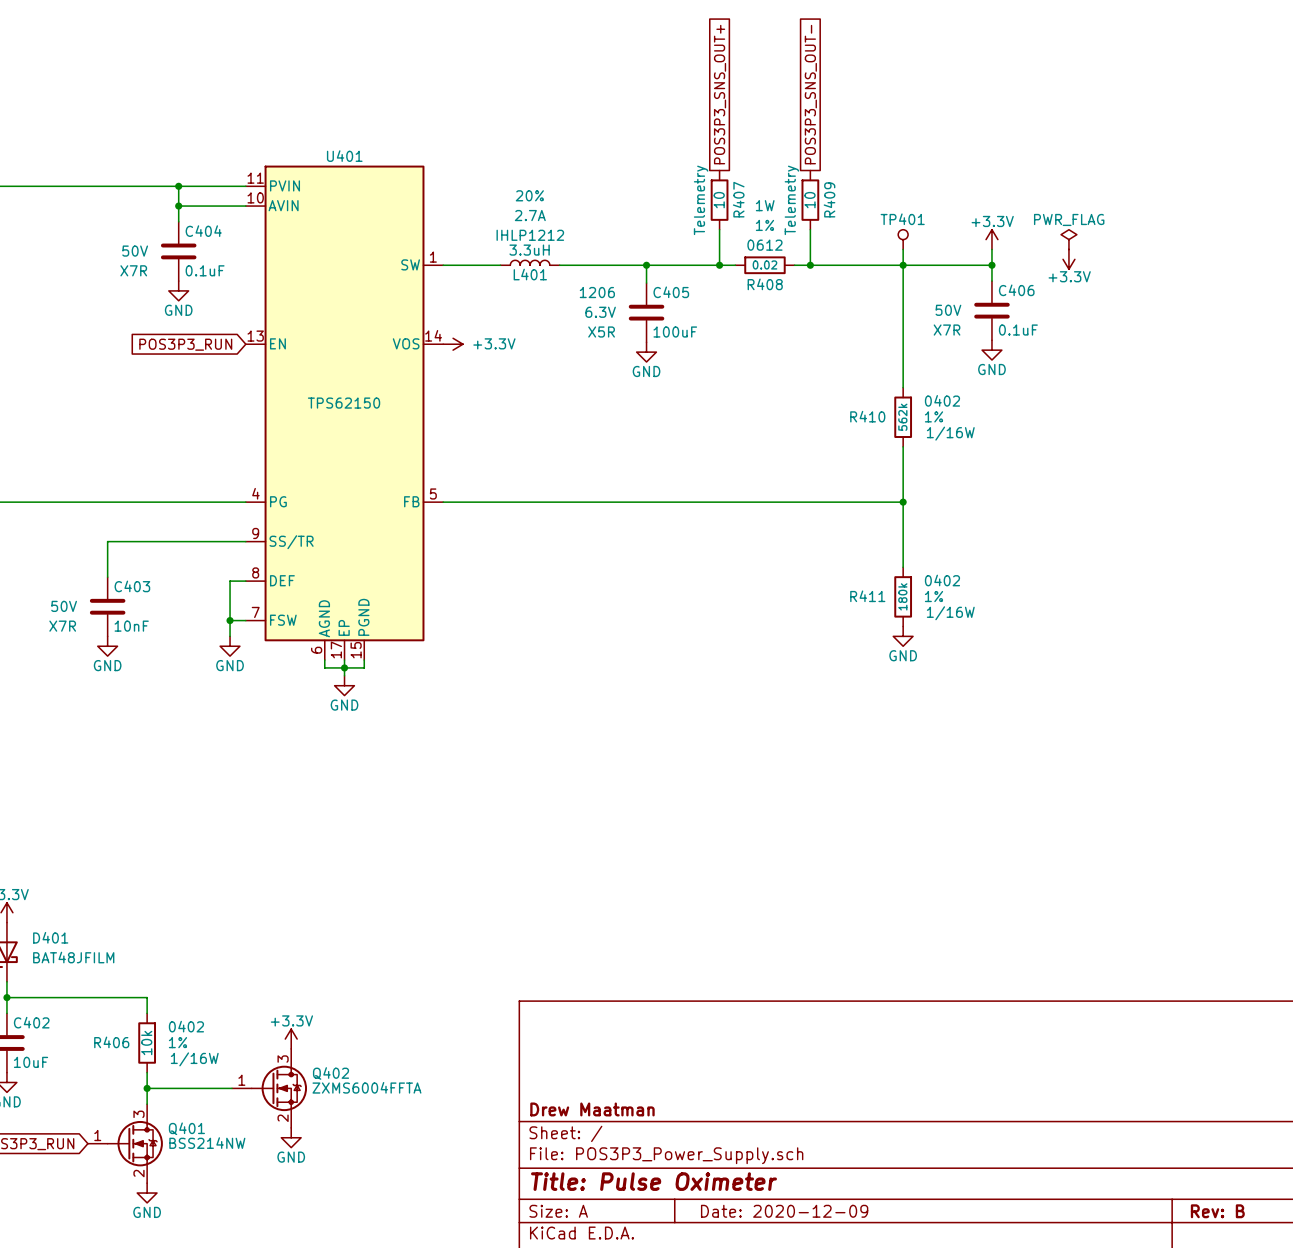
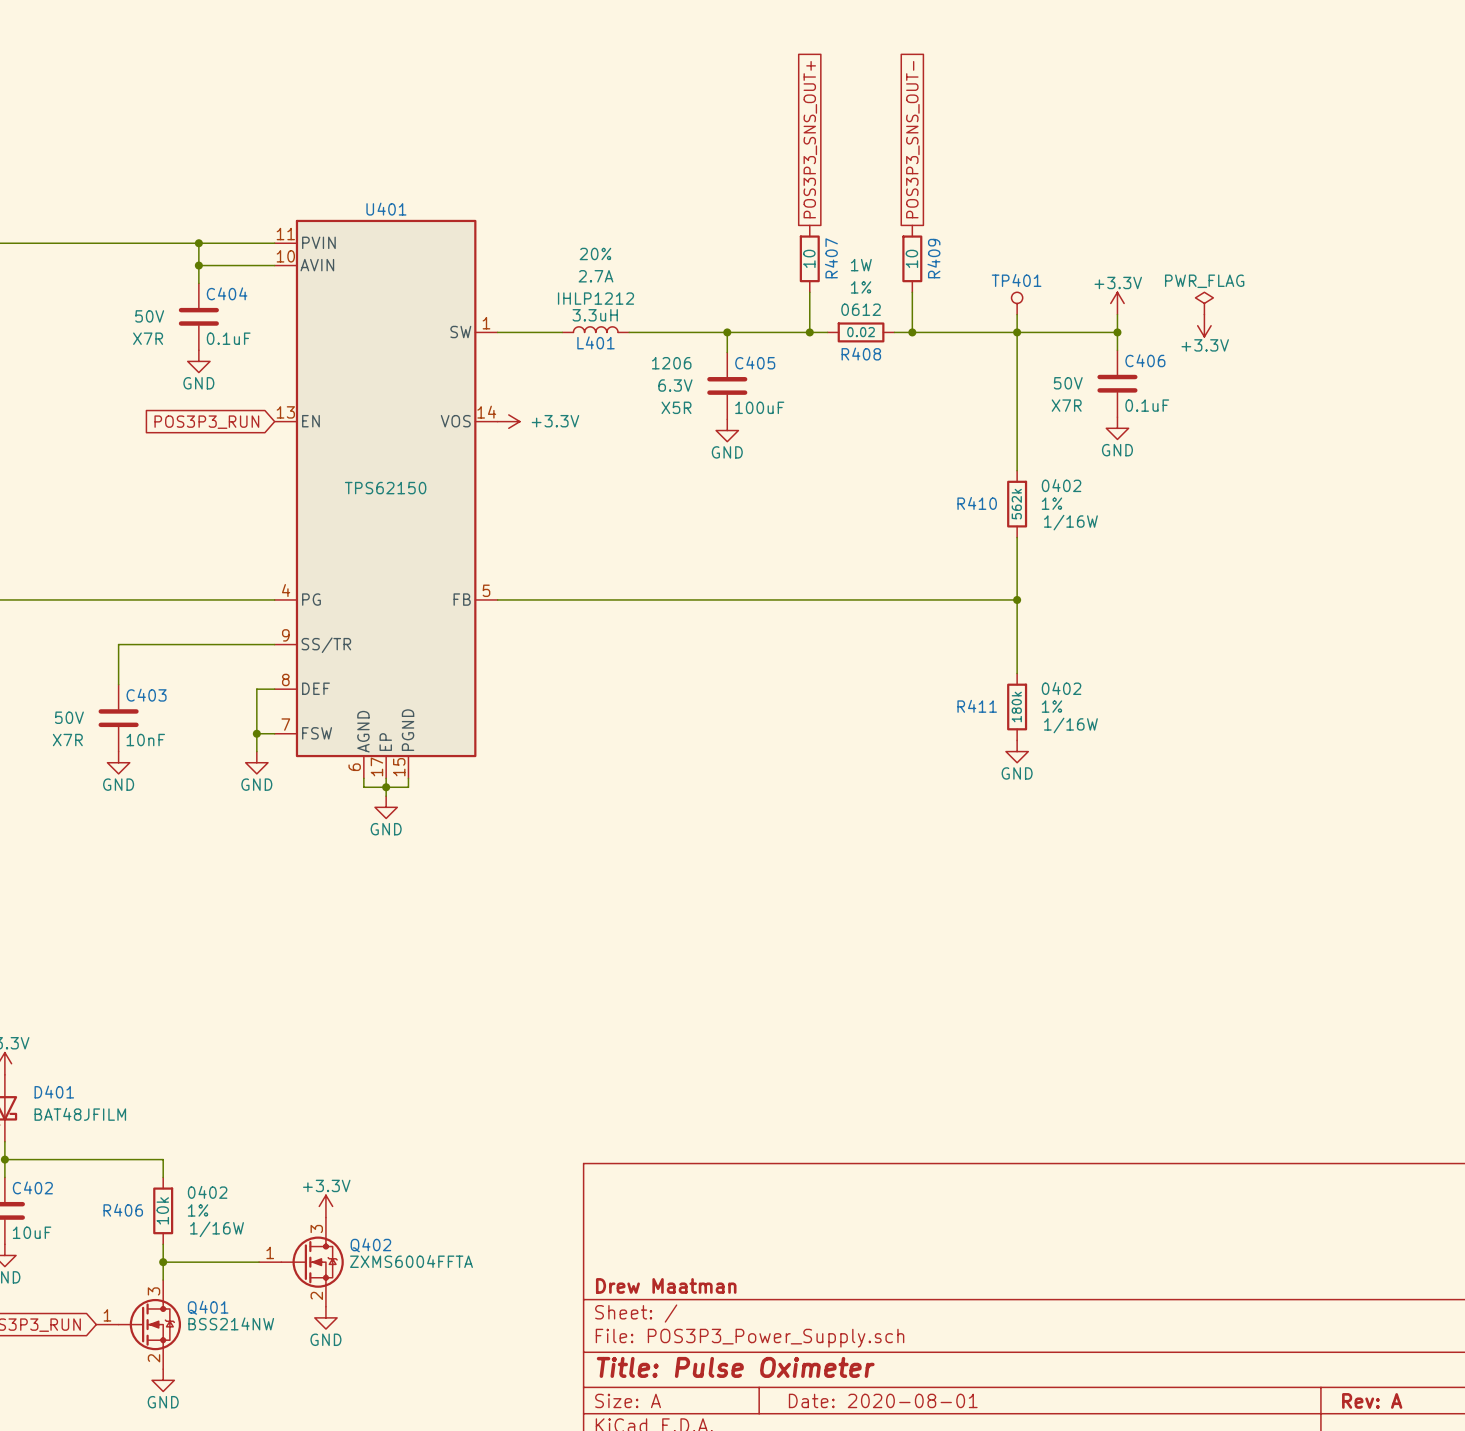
R407 text: Telemetry (701, 200) -> none
R409 text: Telemetry (791, 200) -> none
title block: Date: 2020-12-09 (784, 1211) -> Date: 2020-08-01 (883, 1400)
title block: Rev: B (1217, 1211) -> Rev: A (1372, 1400)

